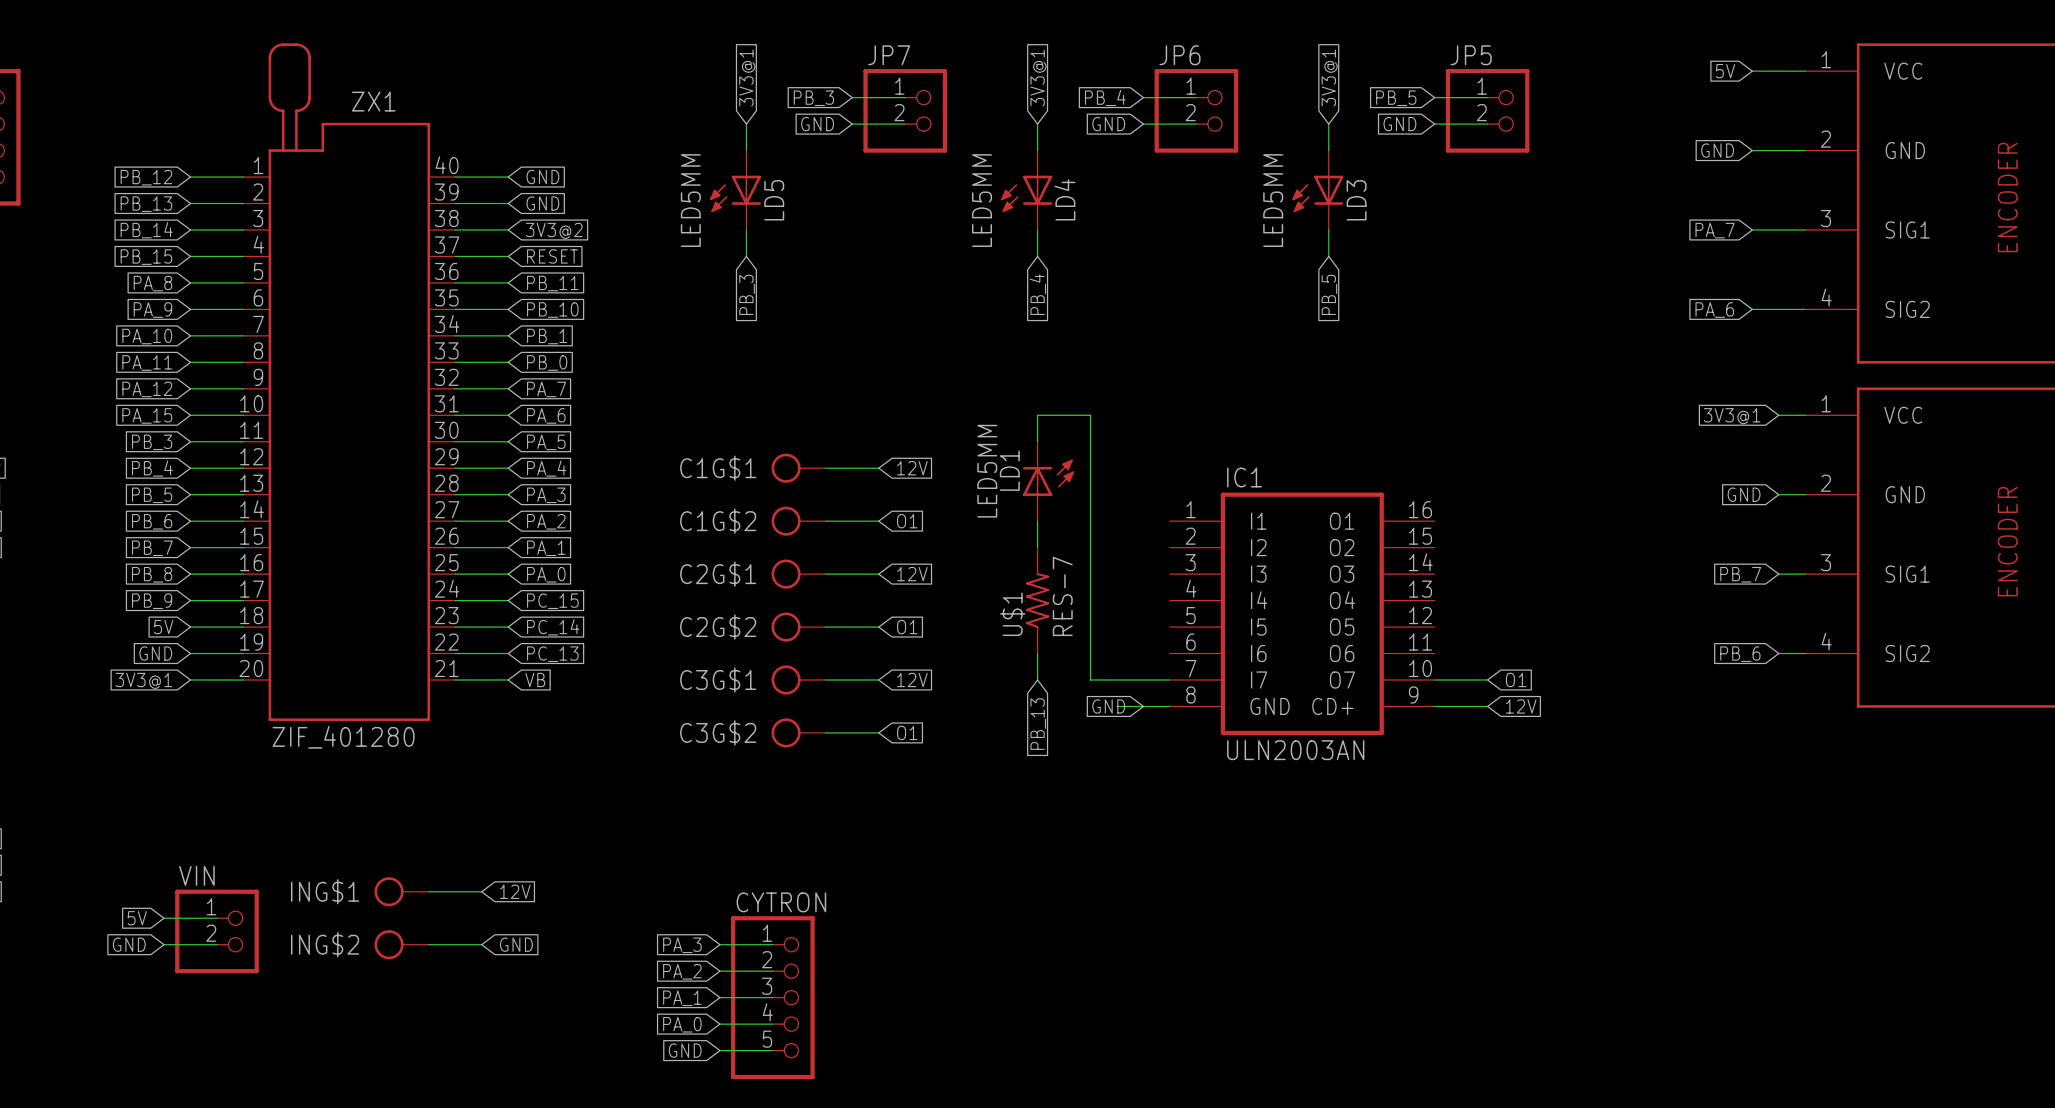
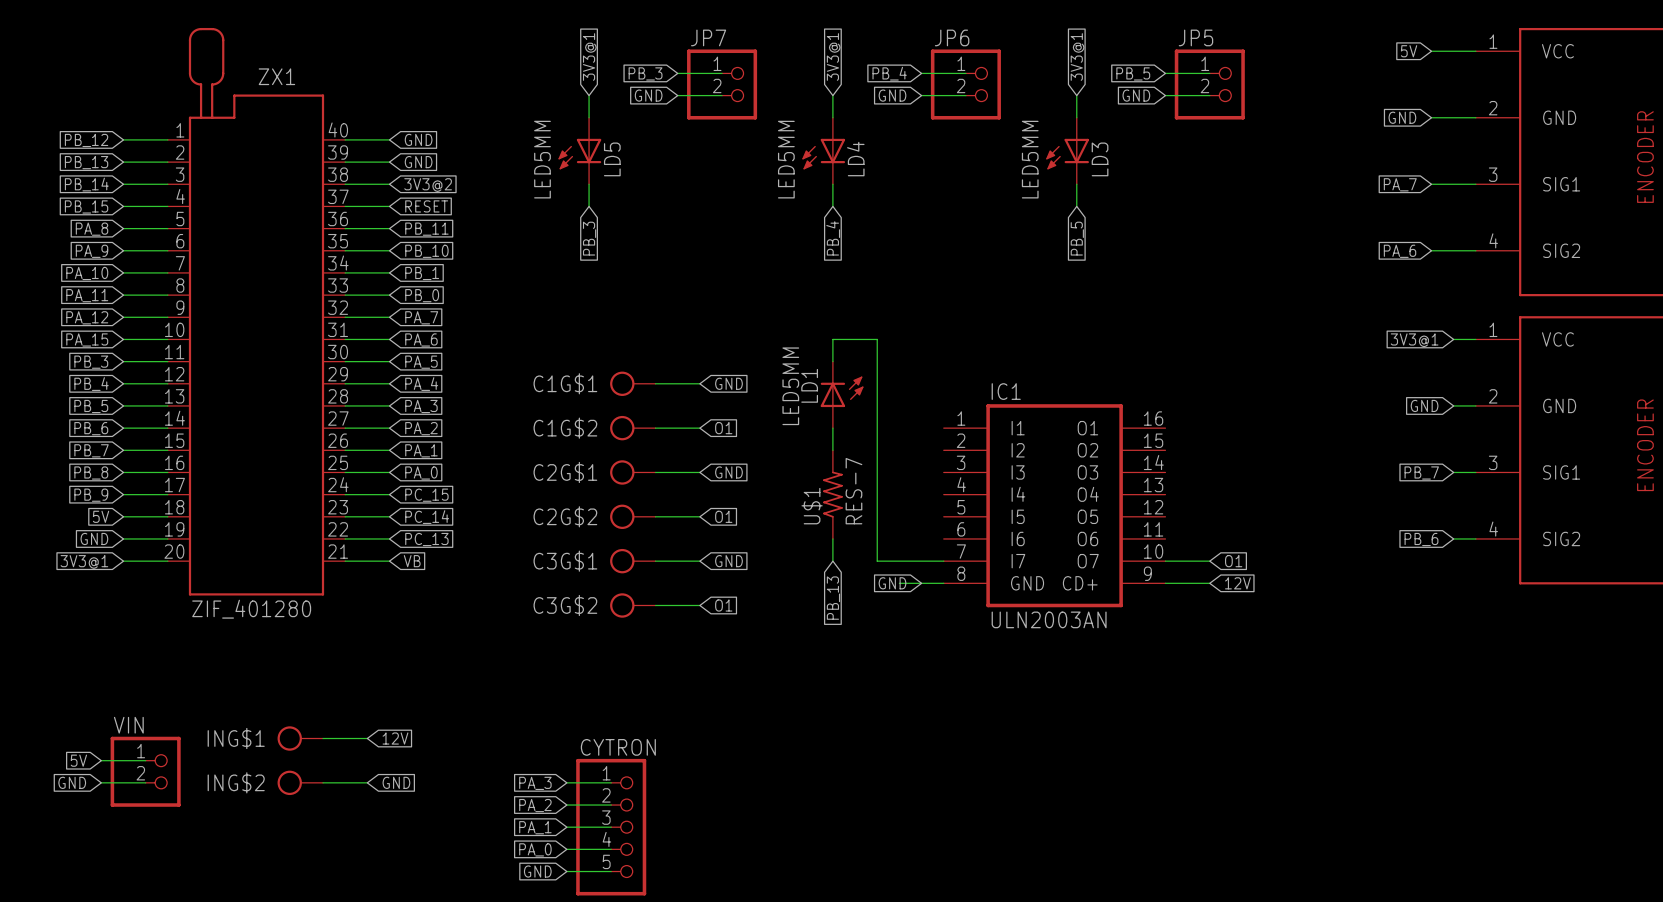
global label: 12V (912, 468) -> GND (728, 383)
global label: 12V (912, 574) -> GND (728, 472)
global label: 12V (912, 679) -> GND (728, 561)

